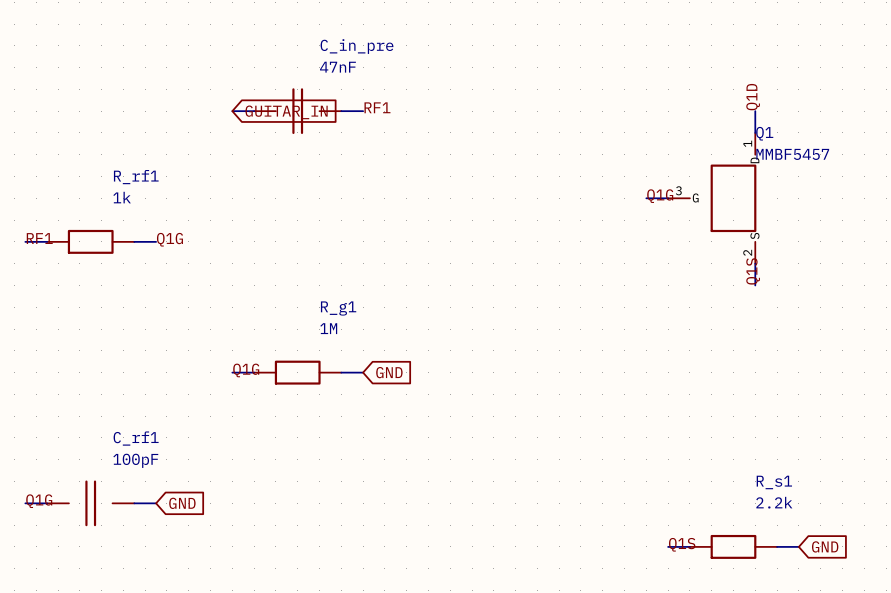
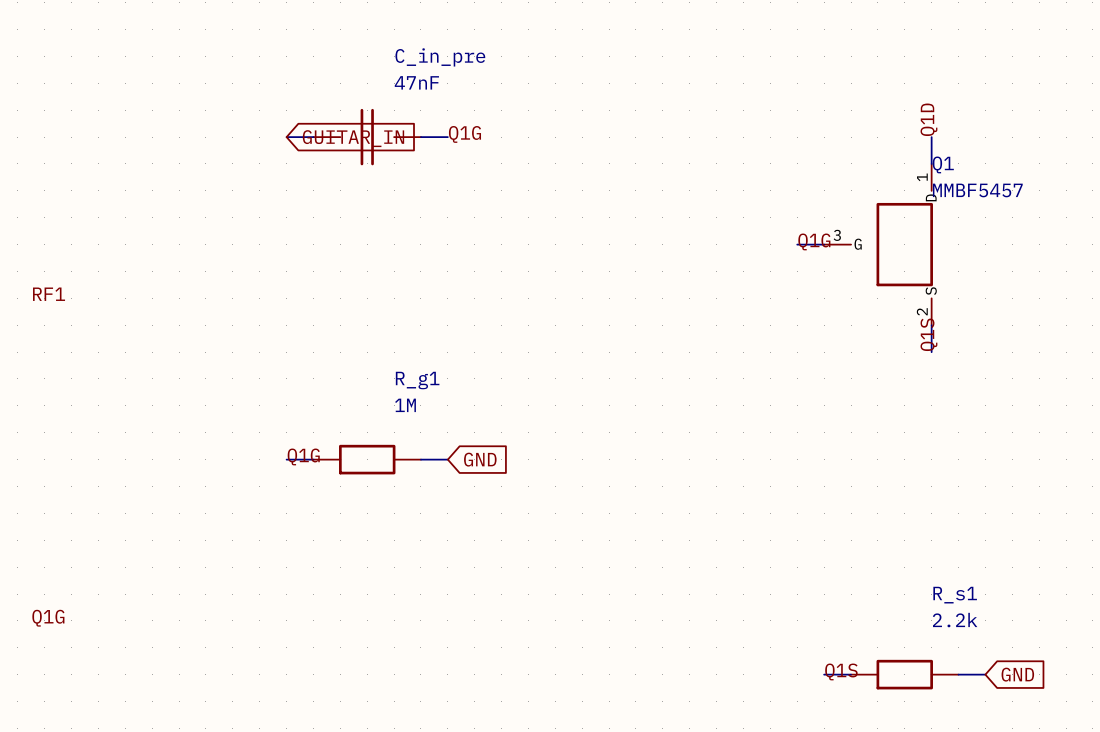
label: RF1 (377, 107) -> Q1G (464, 134)
label: Q1G (169, 239) -> none
wire: (25, 241) (47, 241) -> none
R_rf1: 1k (90, 241) -> none
wire: (134, 241) (156, 241) -> none
wire: (25, 503) (47, 503) -> none
C_rf1: 100pF (90, 503) -> none
wire: (134, 503) (156, 503) -> none
global label: GND (182, 503) -> none

